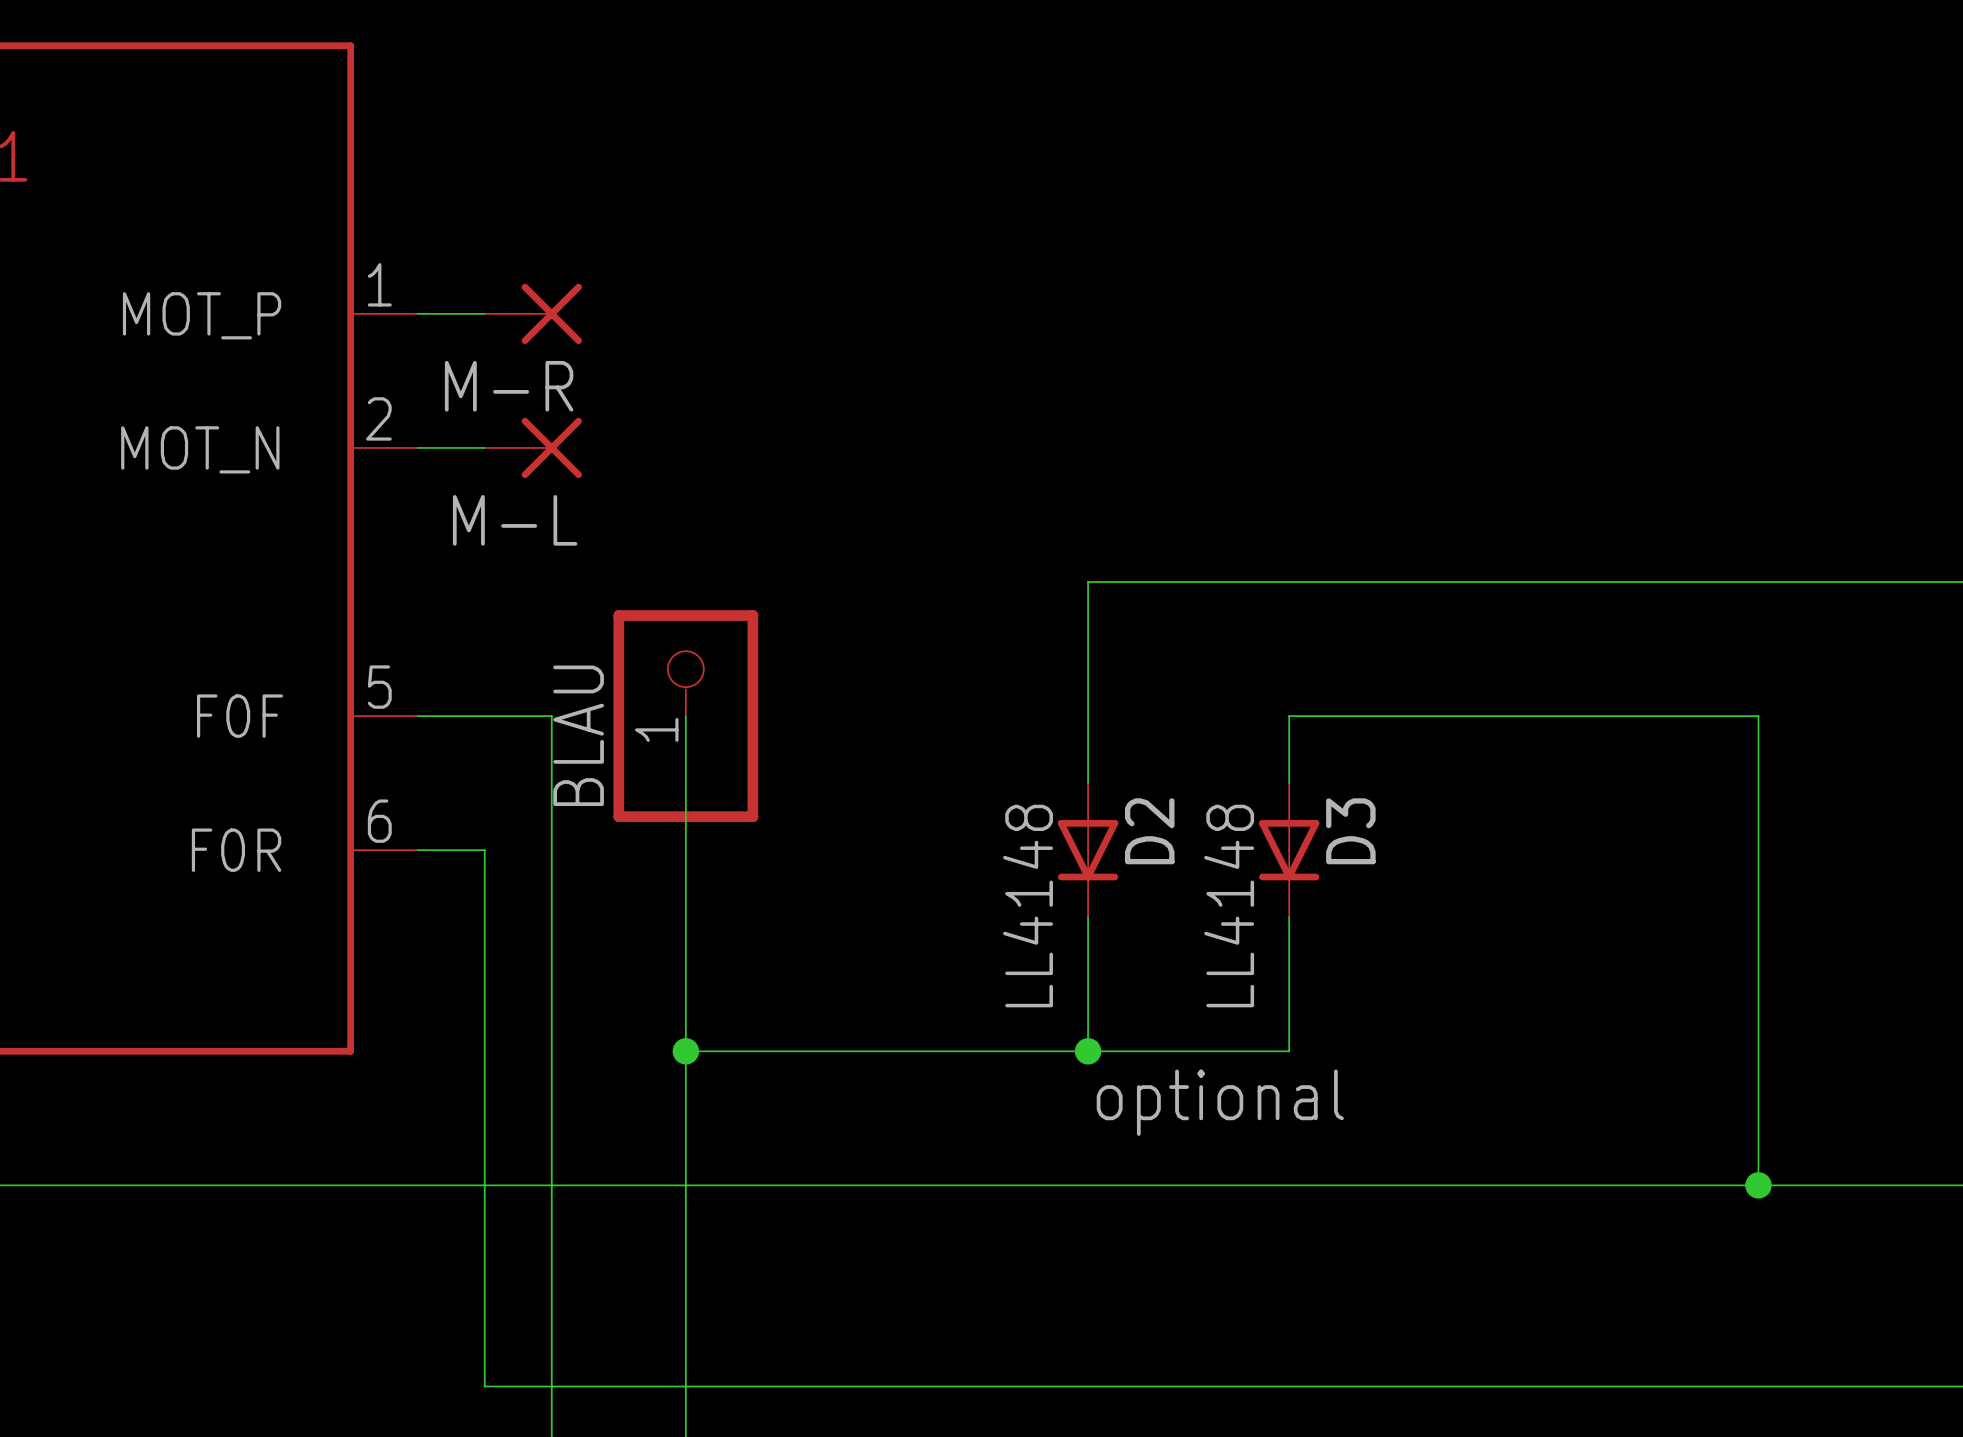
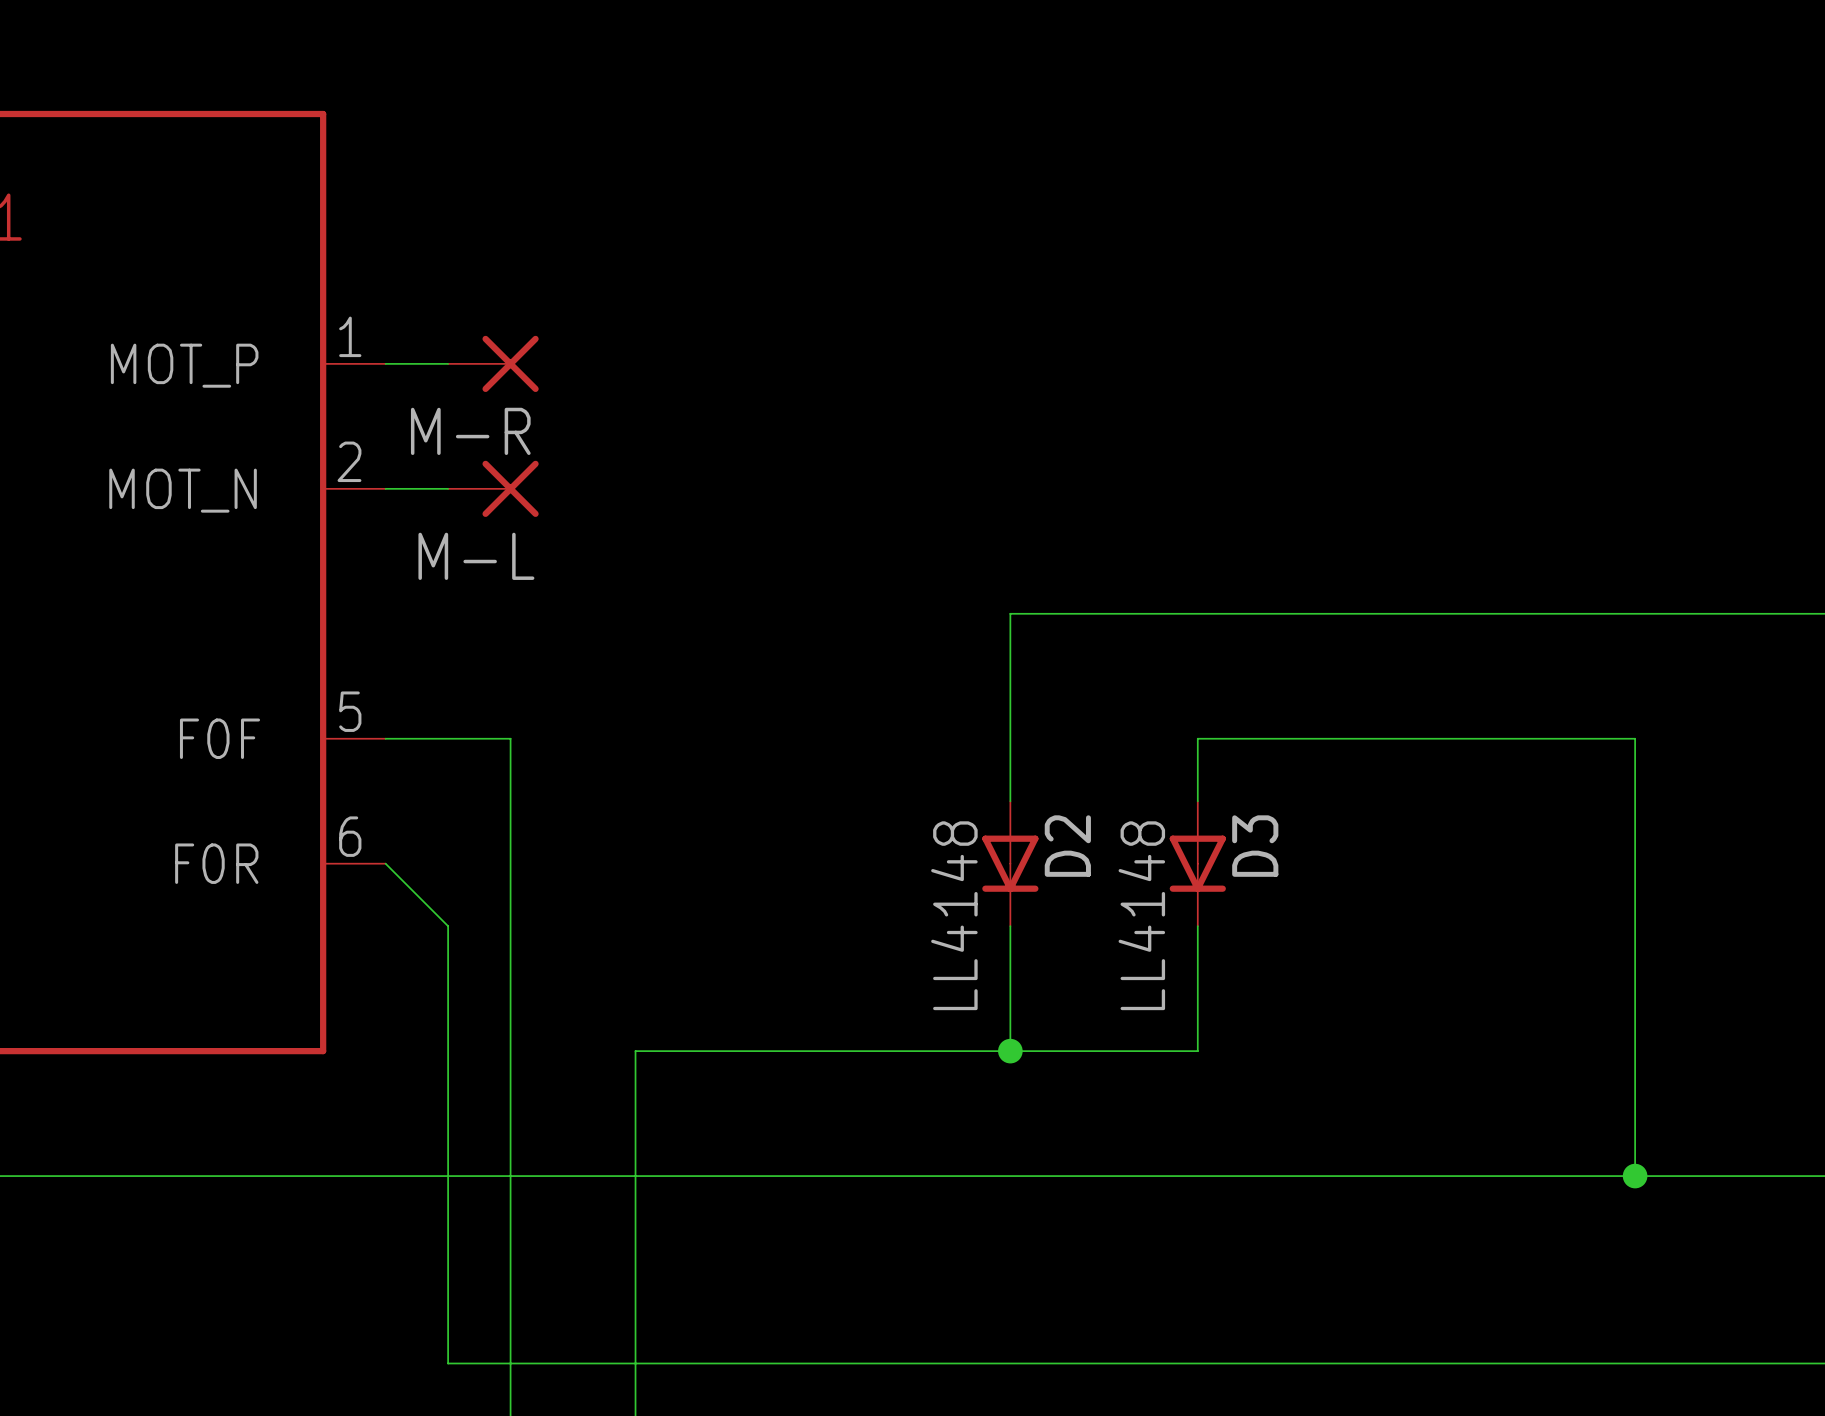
wire: (685, 716) (685, 1051) -> none
BLAU: (685, 716) -> none
wire: (417, 850) (484, 850) (484, 917) -> (385, 863) (448, 926)
junction: (685, 1051) -> none
text: optional (1220, 1102) -> none

